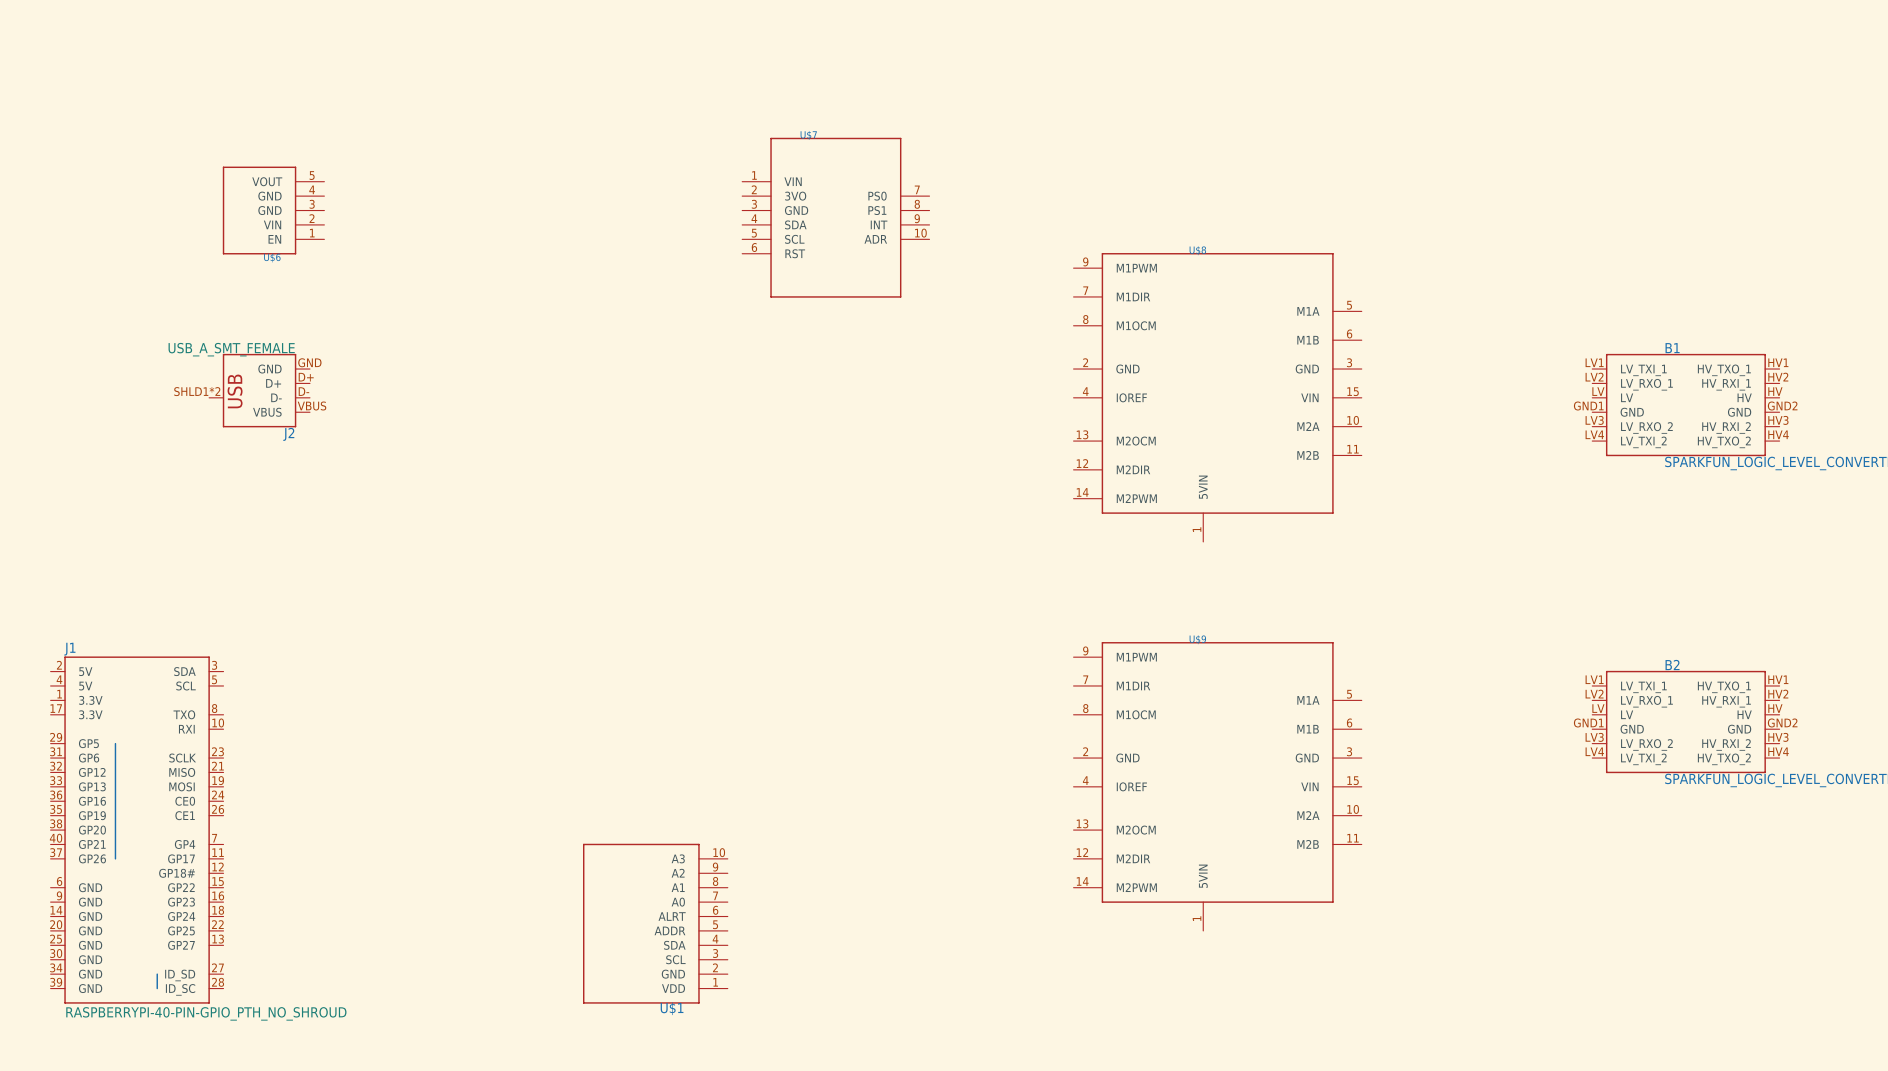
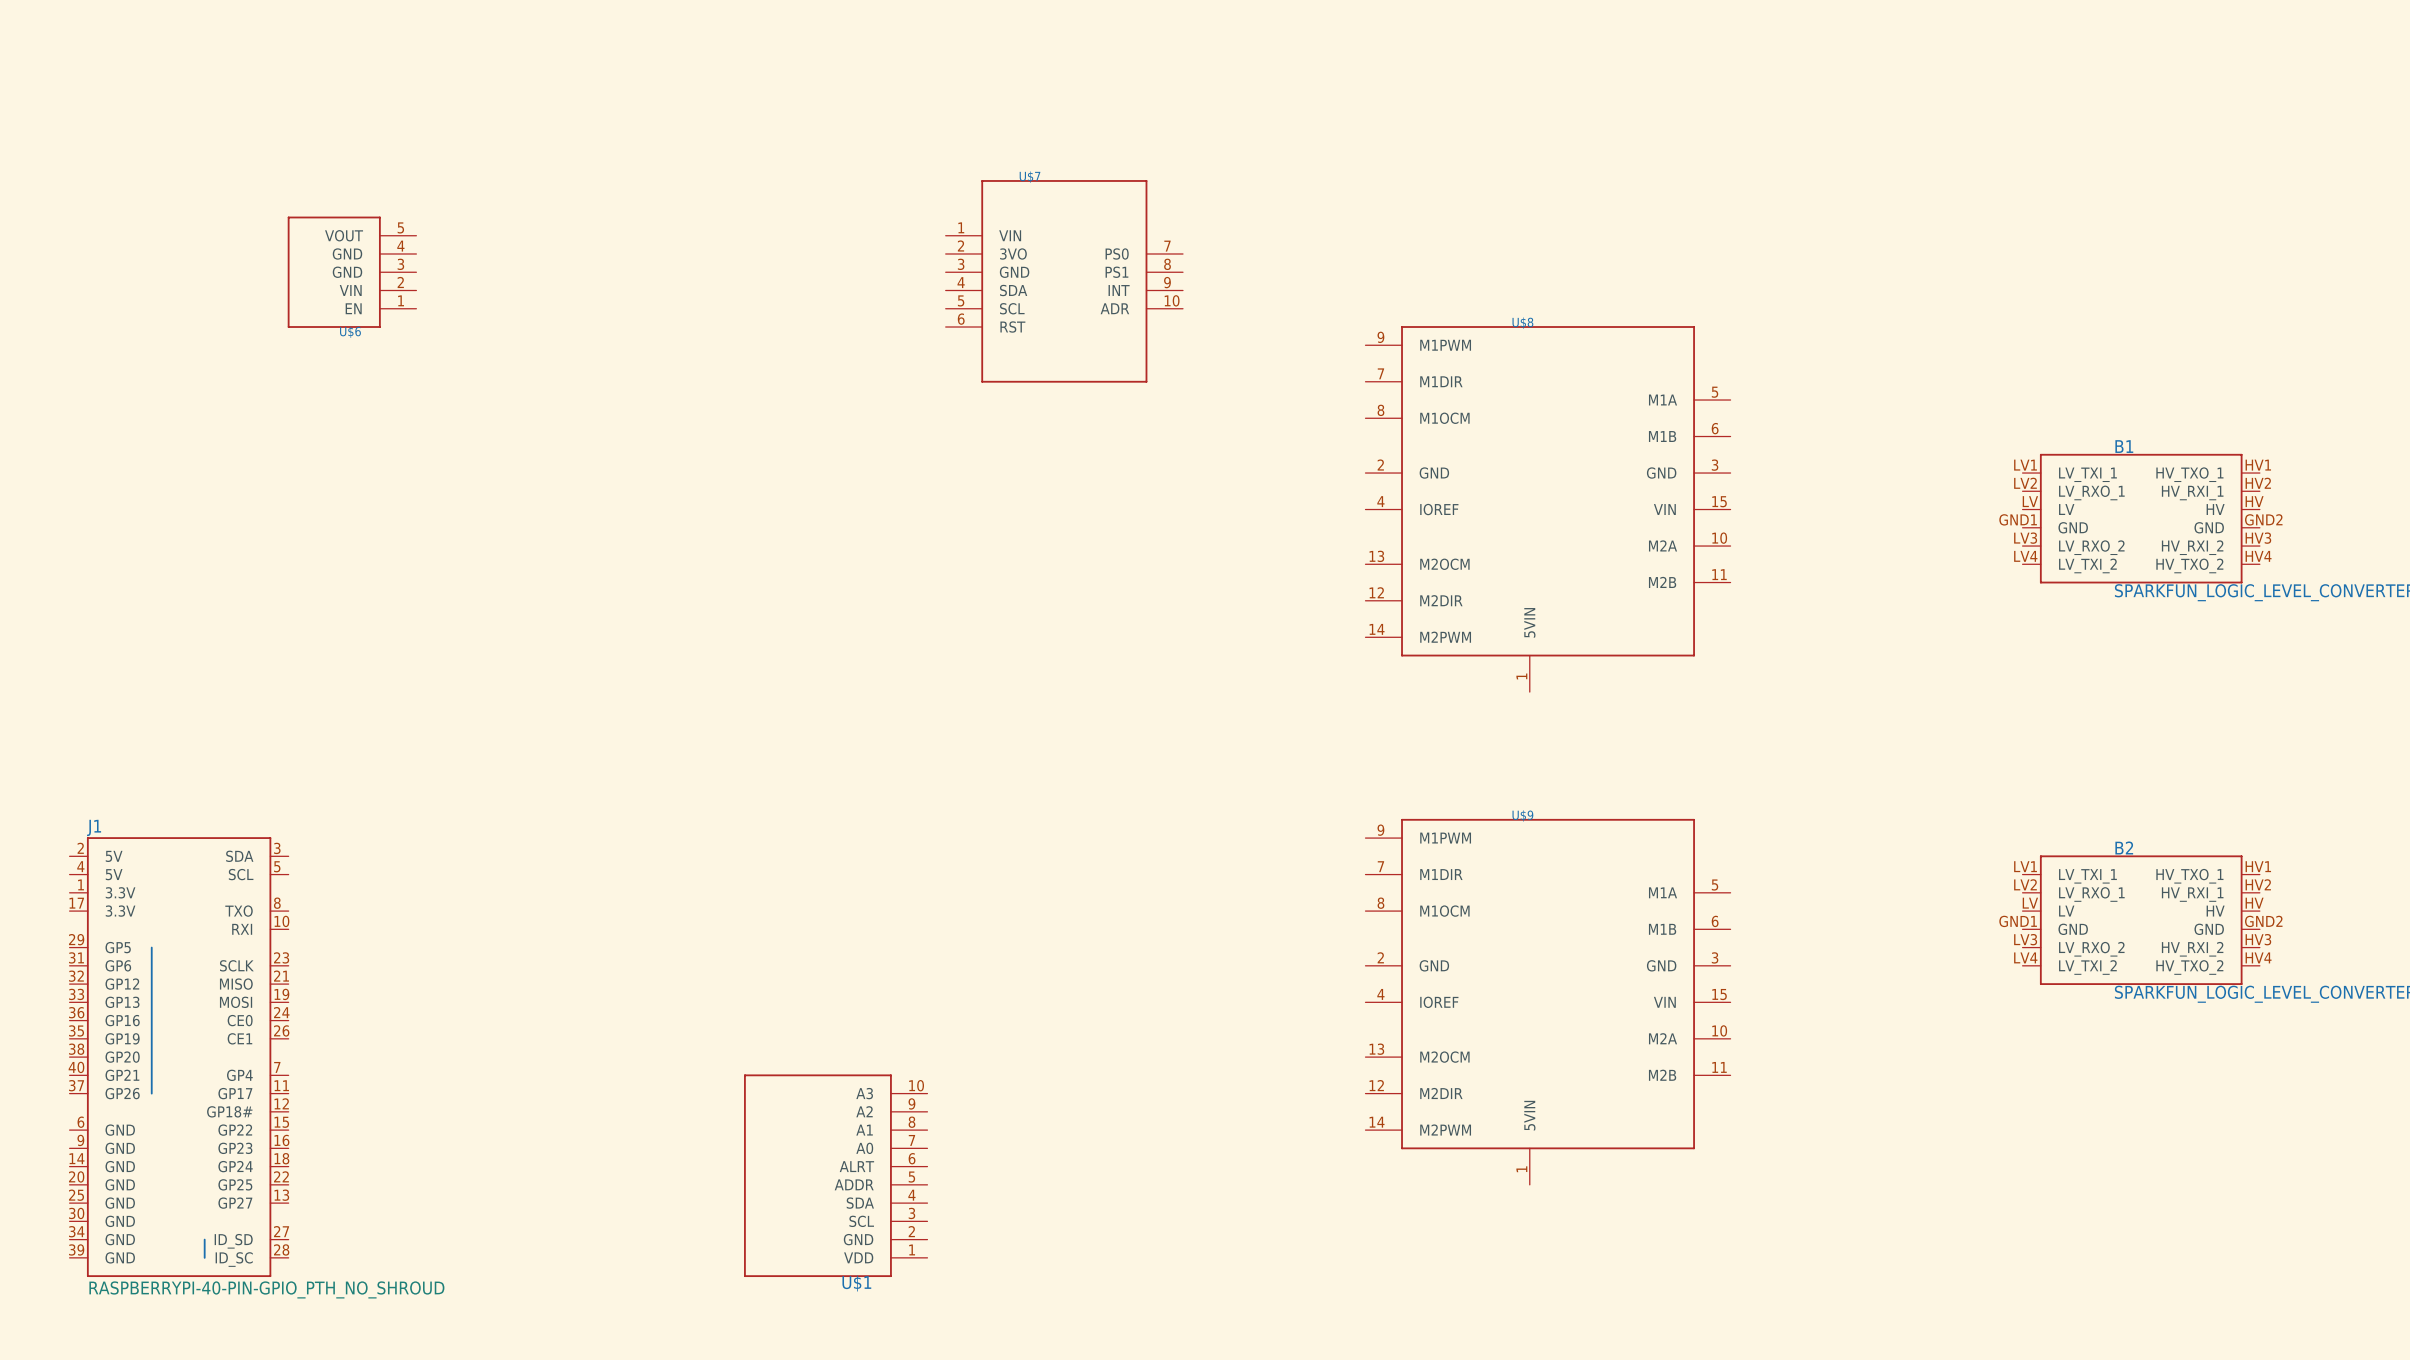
J2: USB_A_SMT_FEMALE (259, 390) -> none

